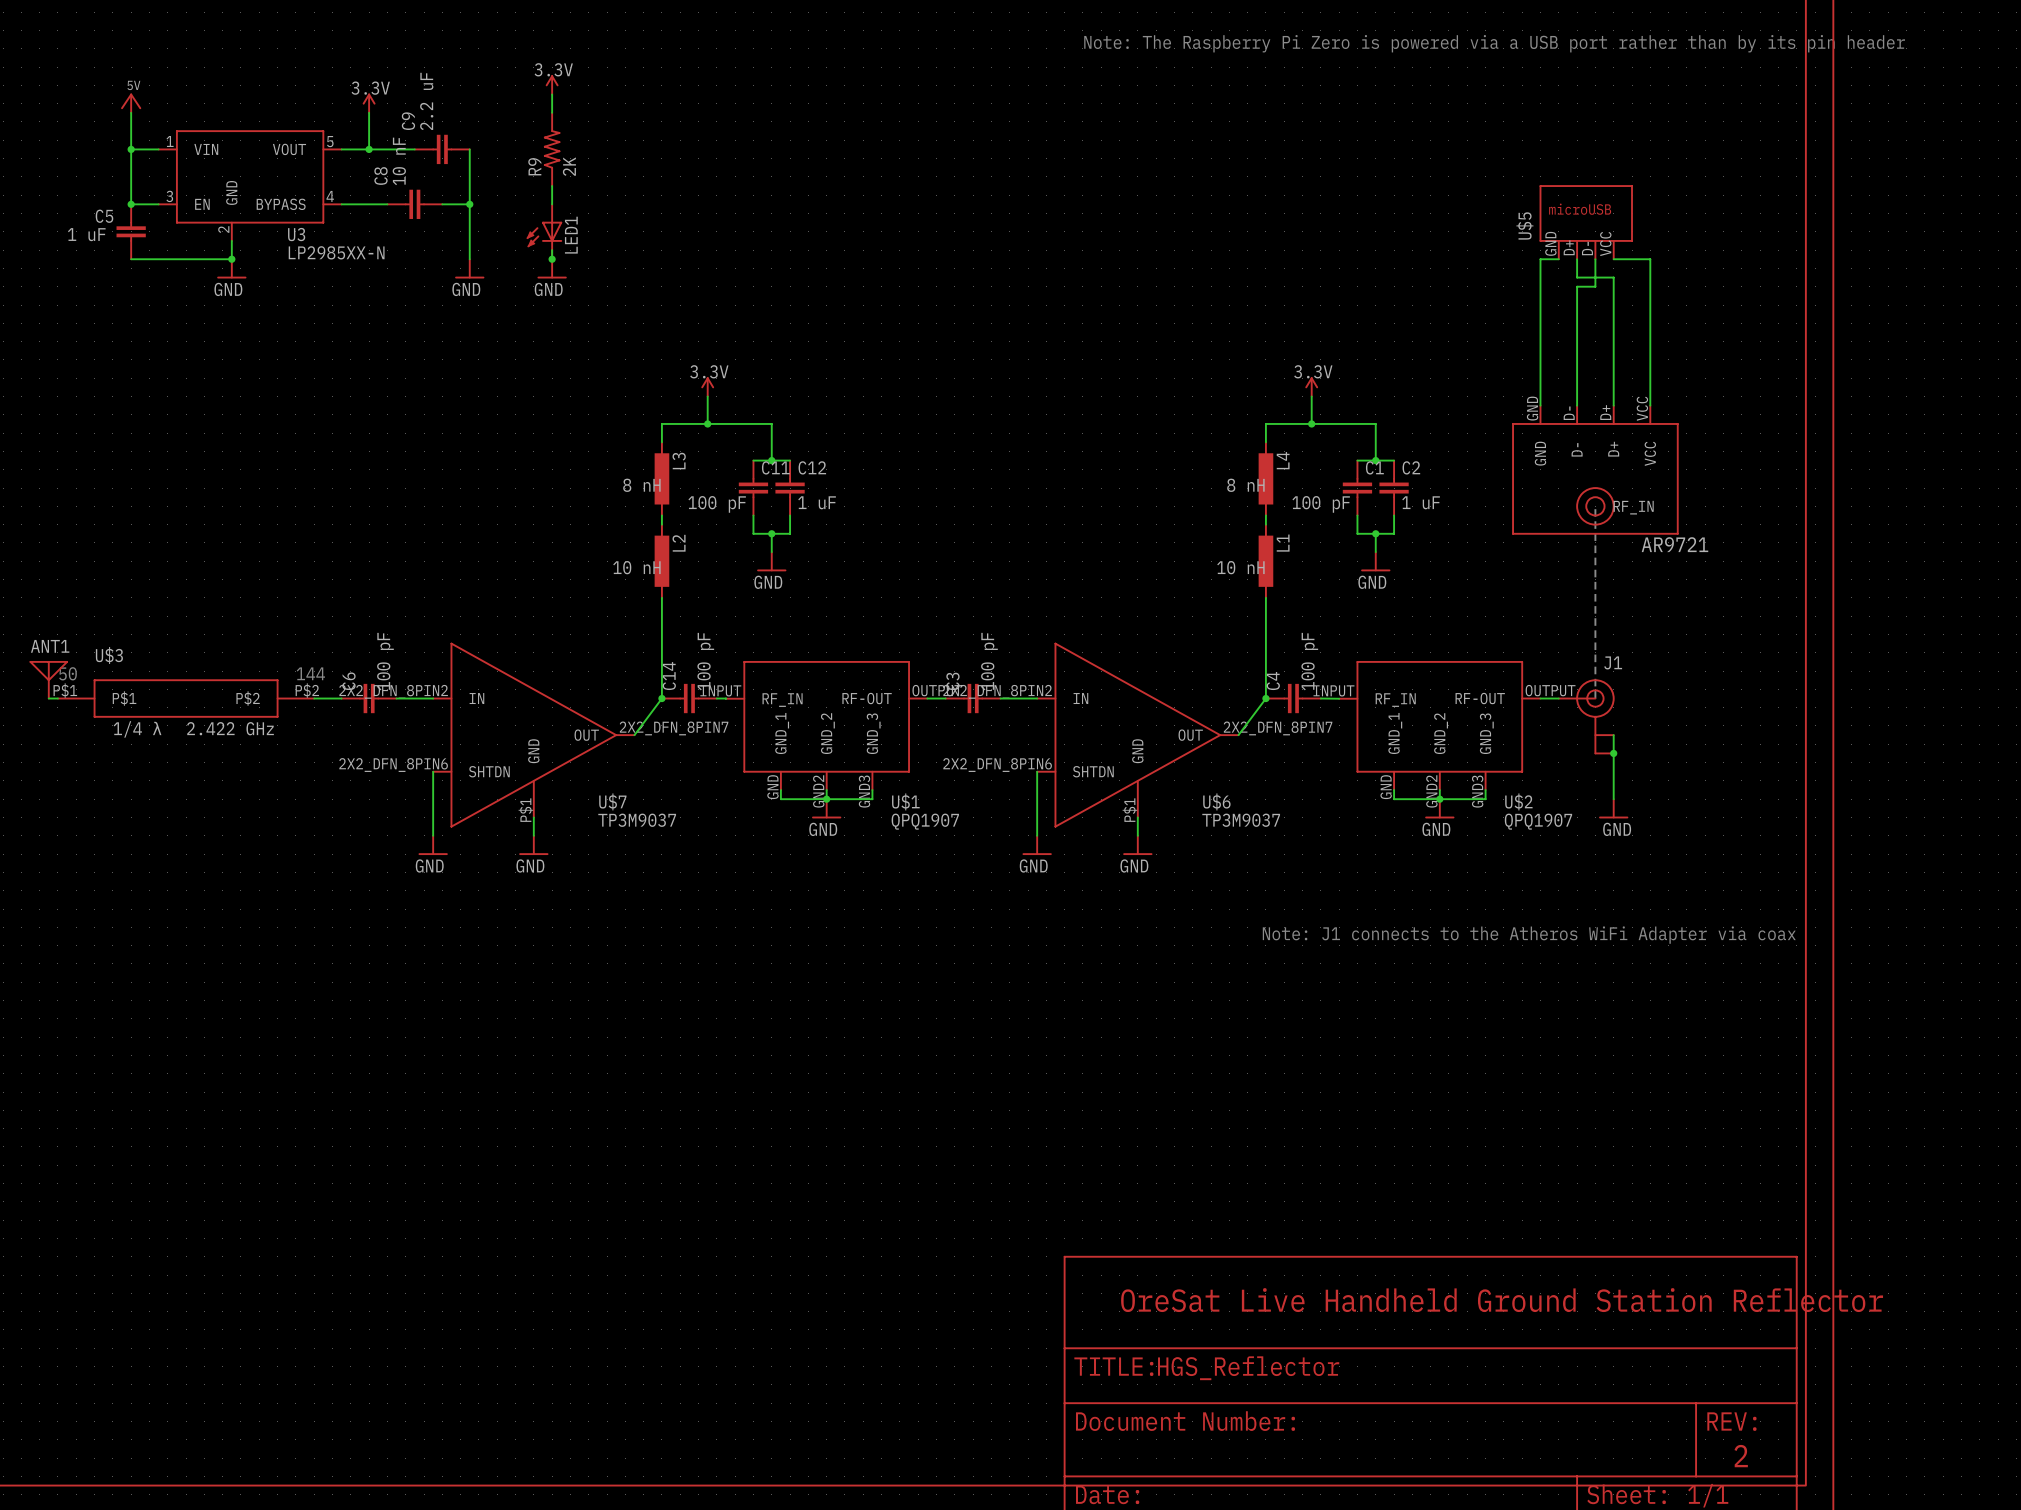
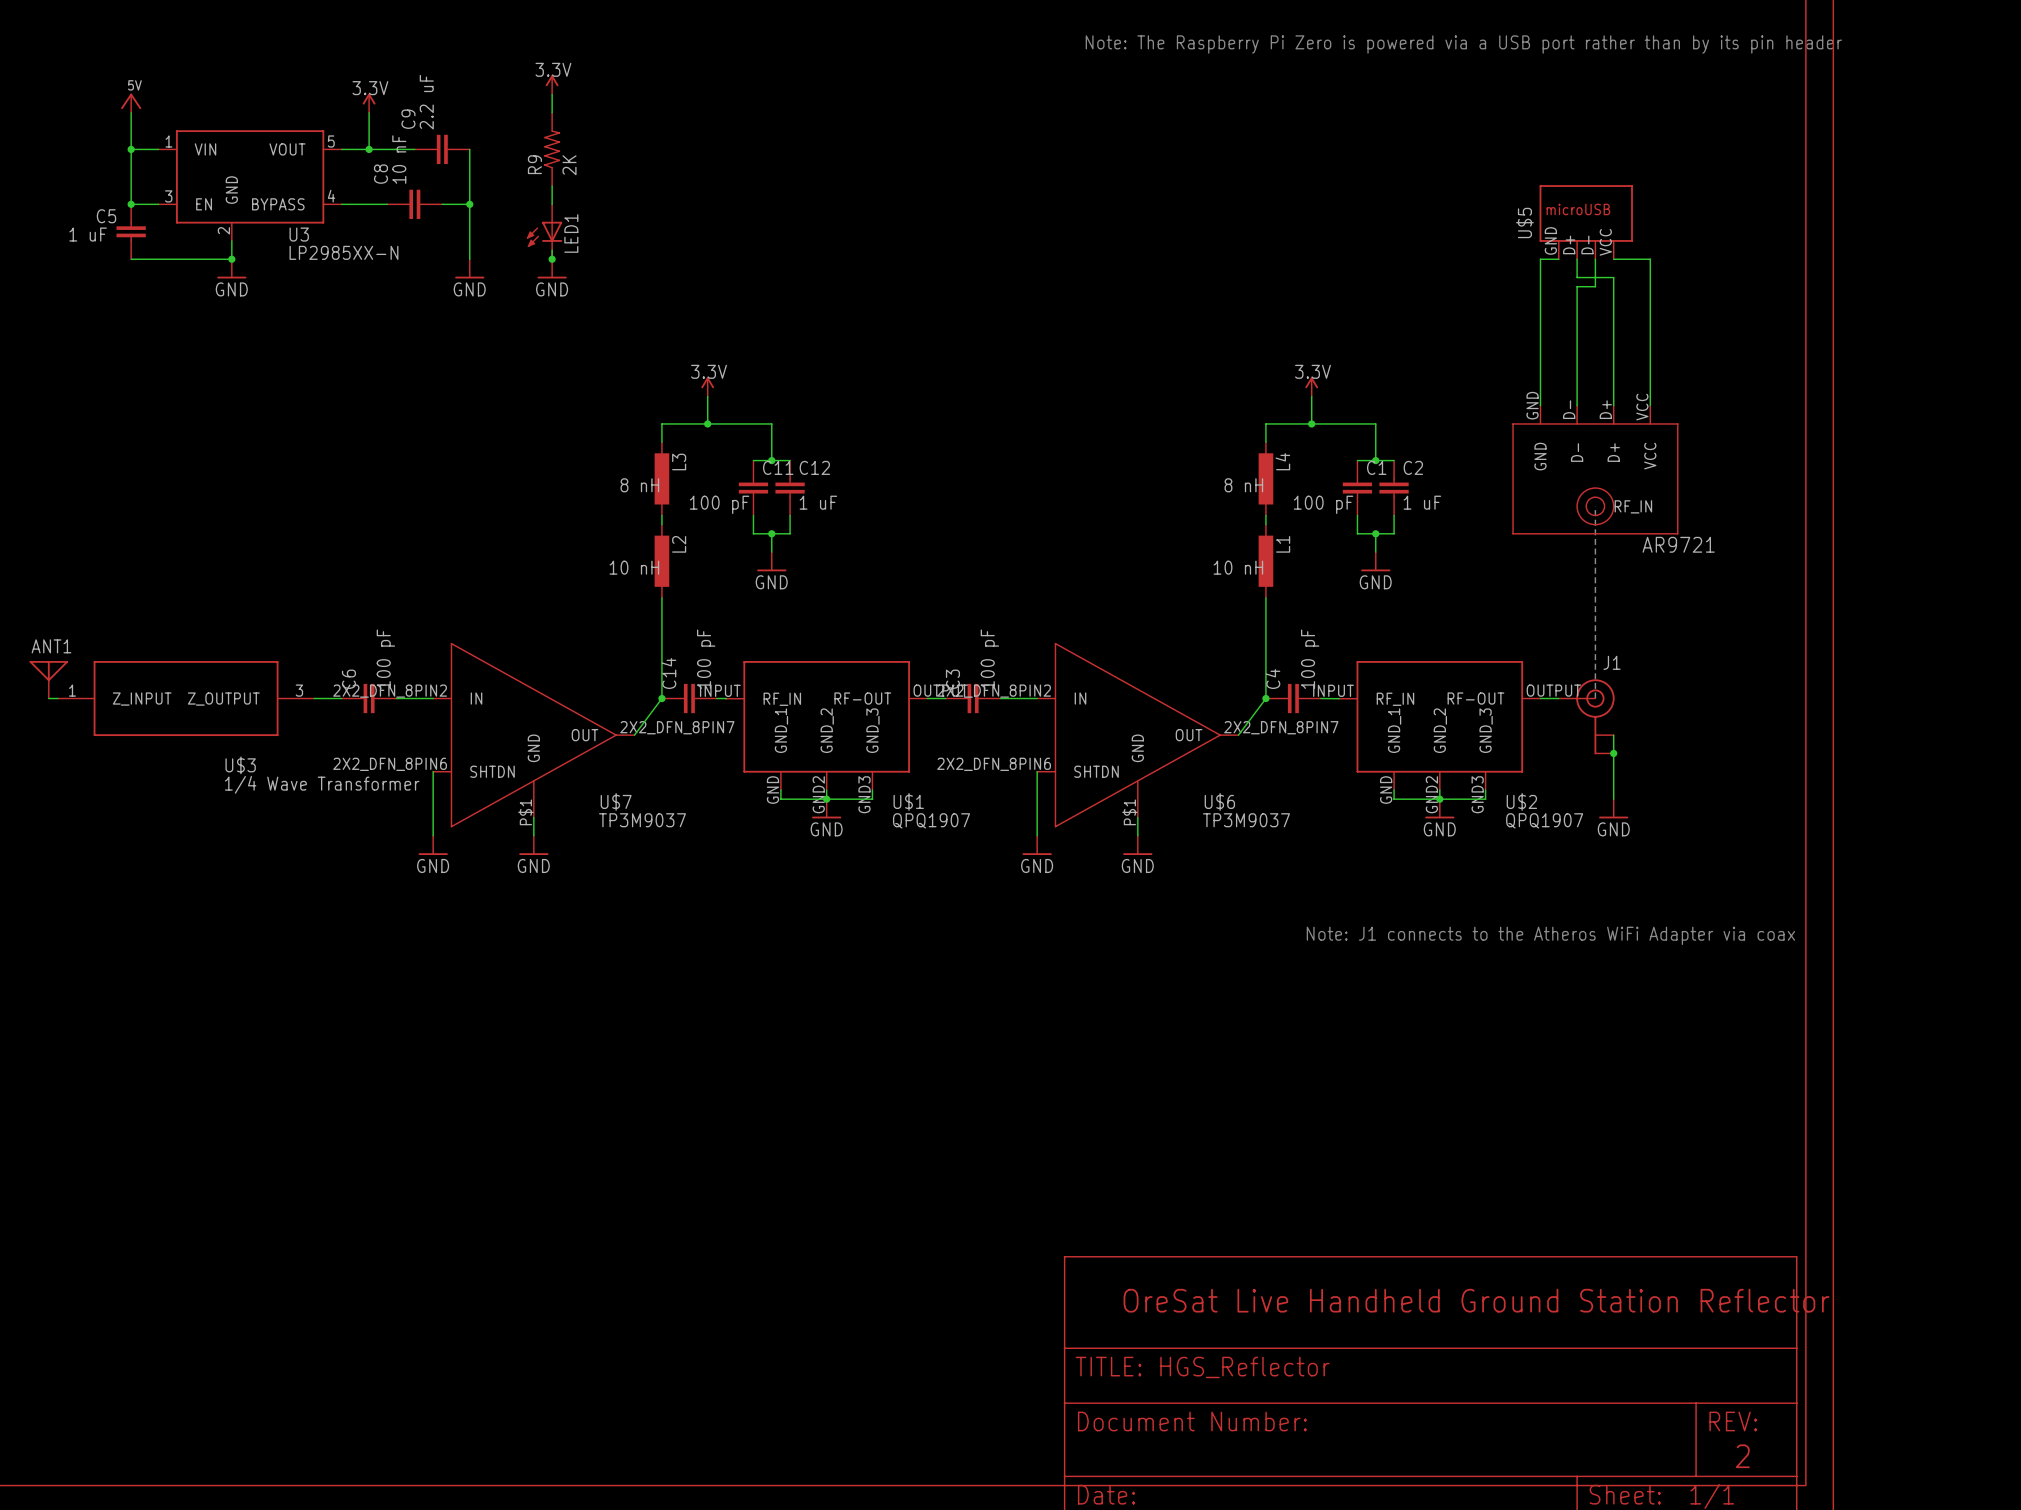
U$3 name position: U$3 (109, 655) -> U$3 (240, 765)
U$3 symbol: [57, 679, 315, 718] -> [57, 661, 315, 737]

